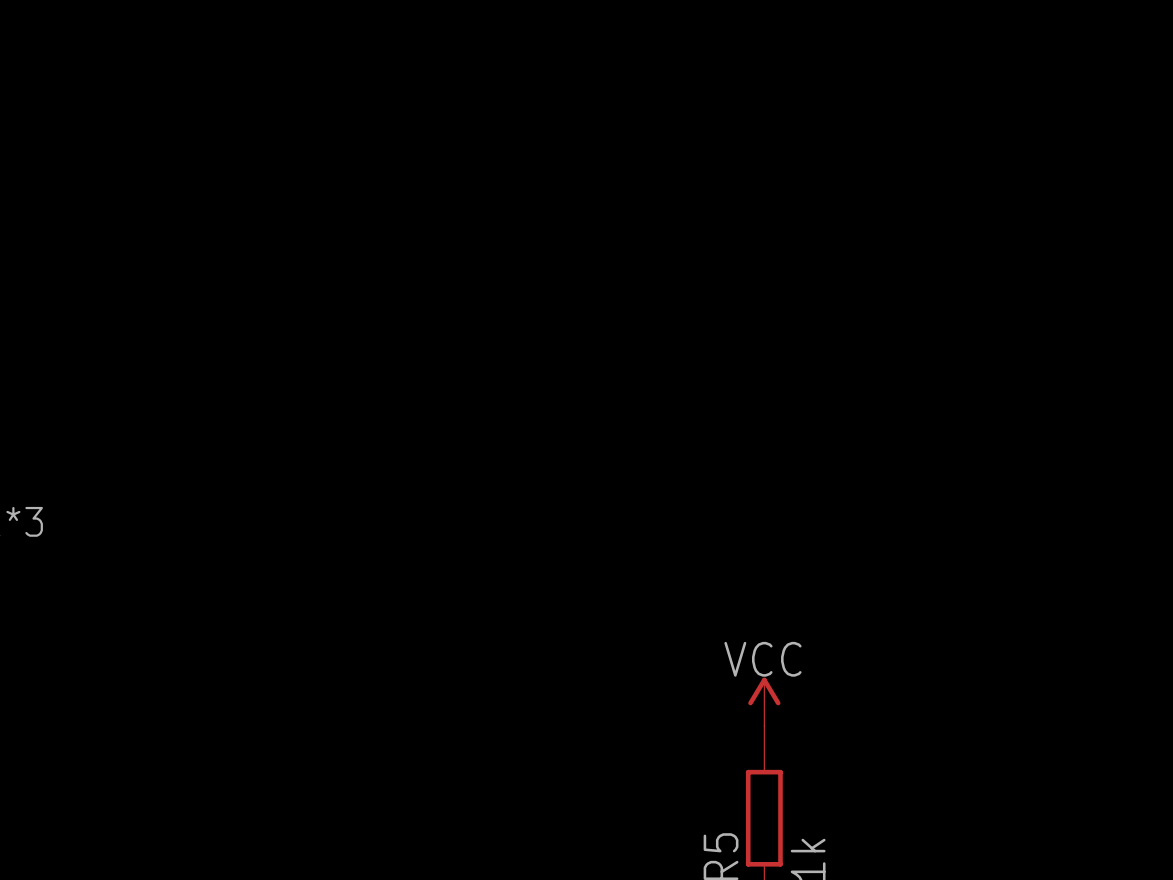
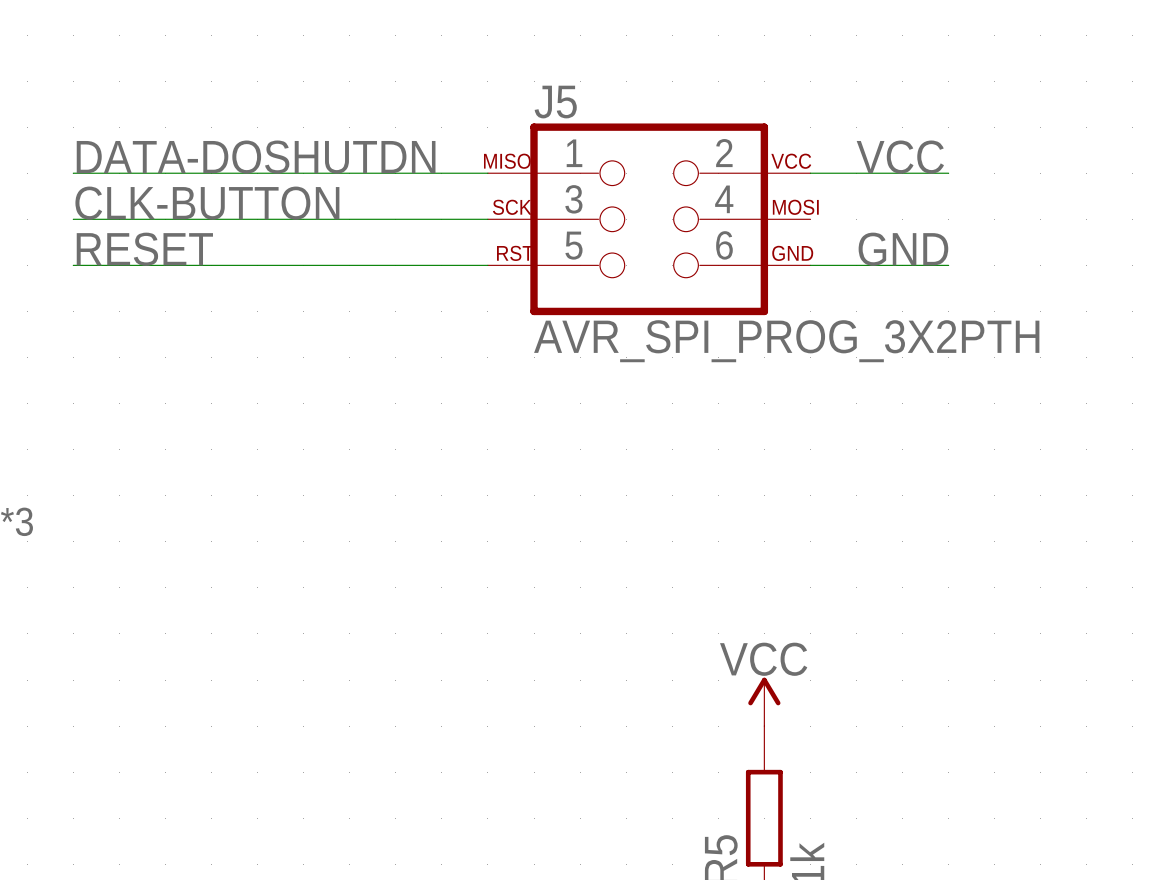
label: none -> DATA-DOSHUTDN (256, 157)
label: none -> VCC (900, 157)
wire: none -> (73, 173) (487, 173)
wire: none -> (810, 173) (948, 173)
label: none -> CLK-BUTTON (207, 203)
wire: none -> (73, 219) (487, 219)
J5: none -> AVR_SPI_PROG_3X2PTH (649, 219)
label: none -> RESET (144, 249)
label: none -> GND (903, 249)
wire: none -> (73, 265) (487, 265)
wire: none -> (810, 265) (948, 265)

